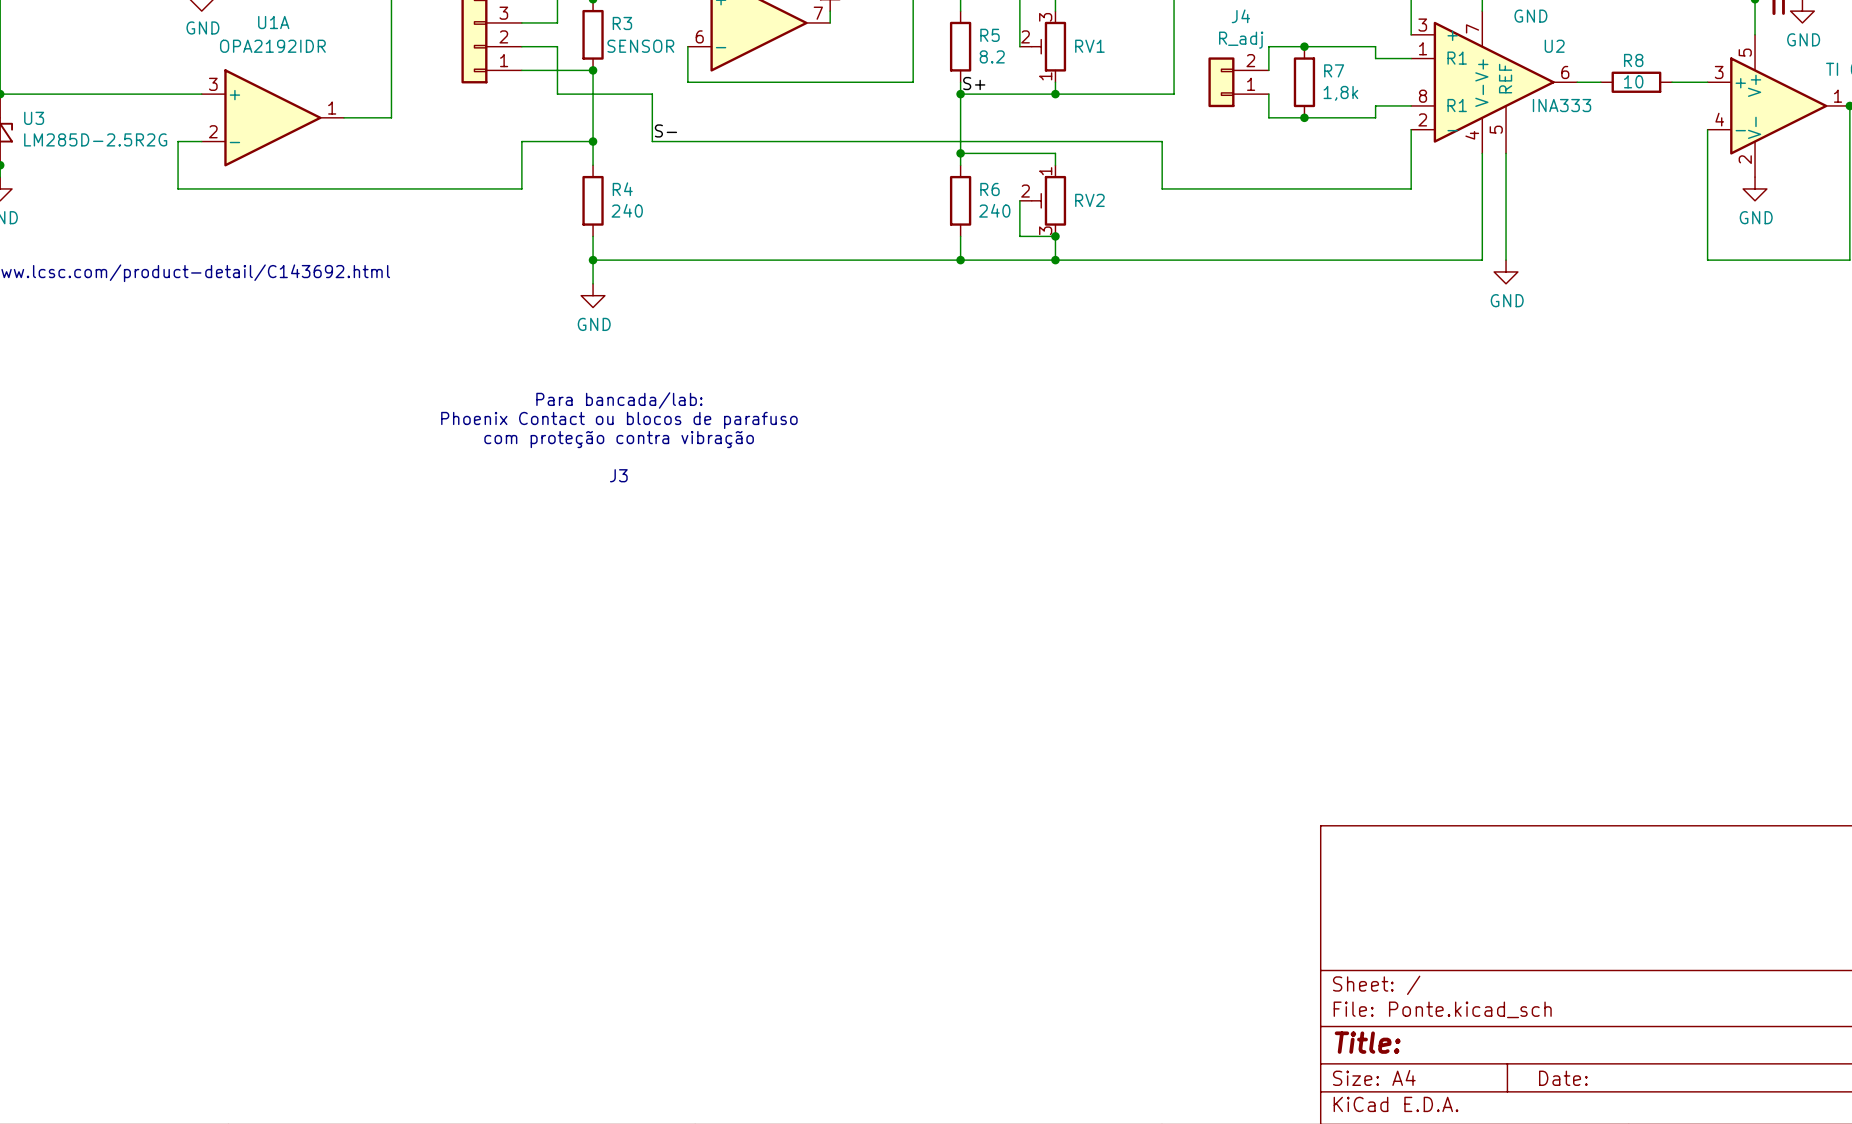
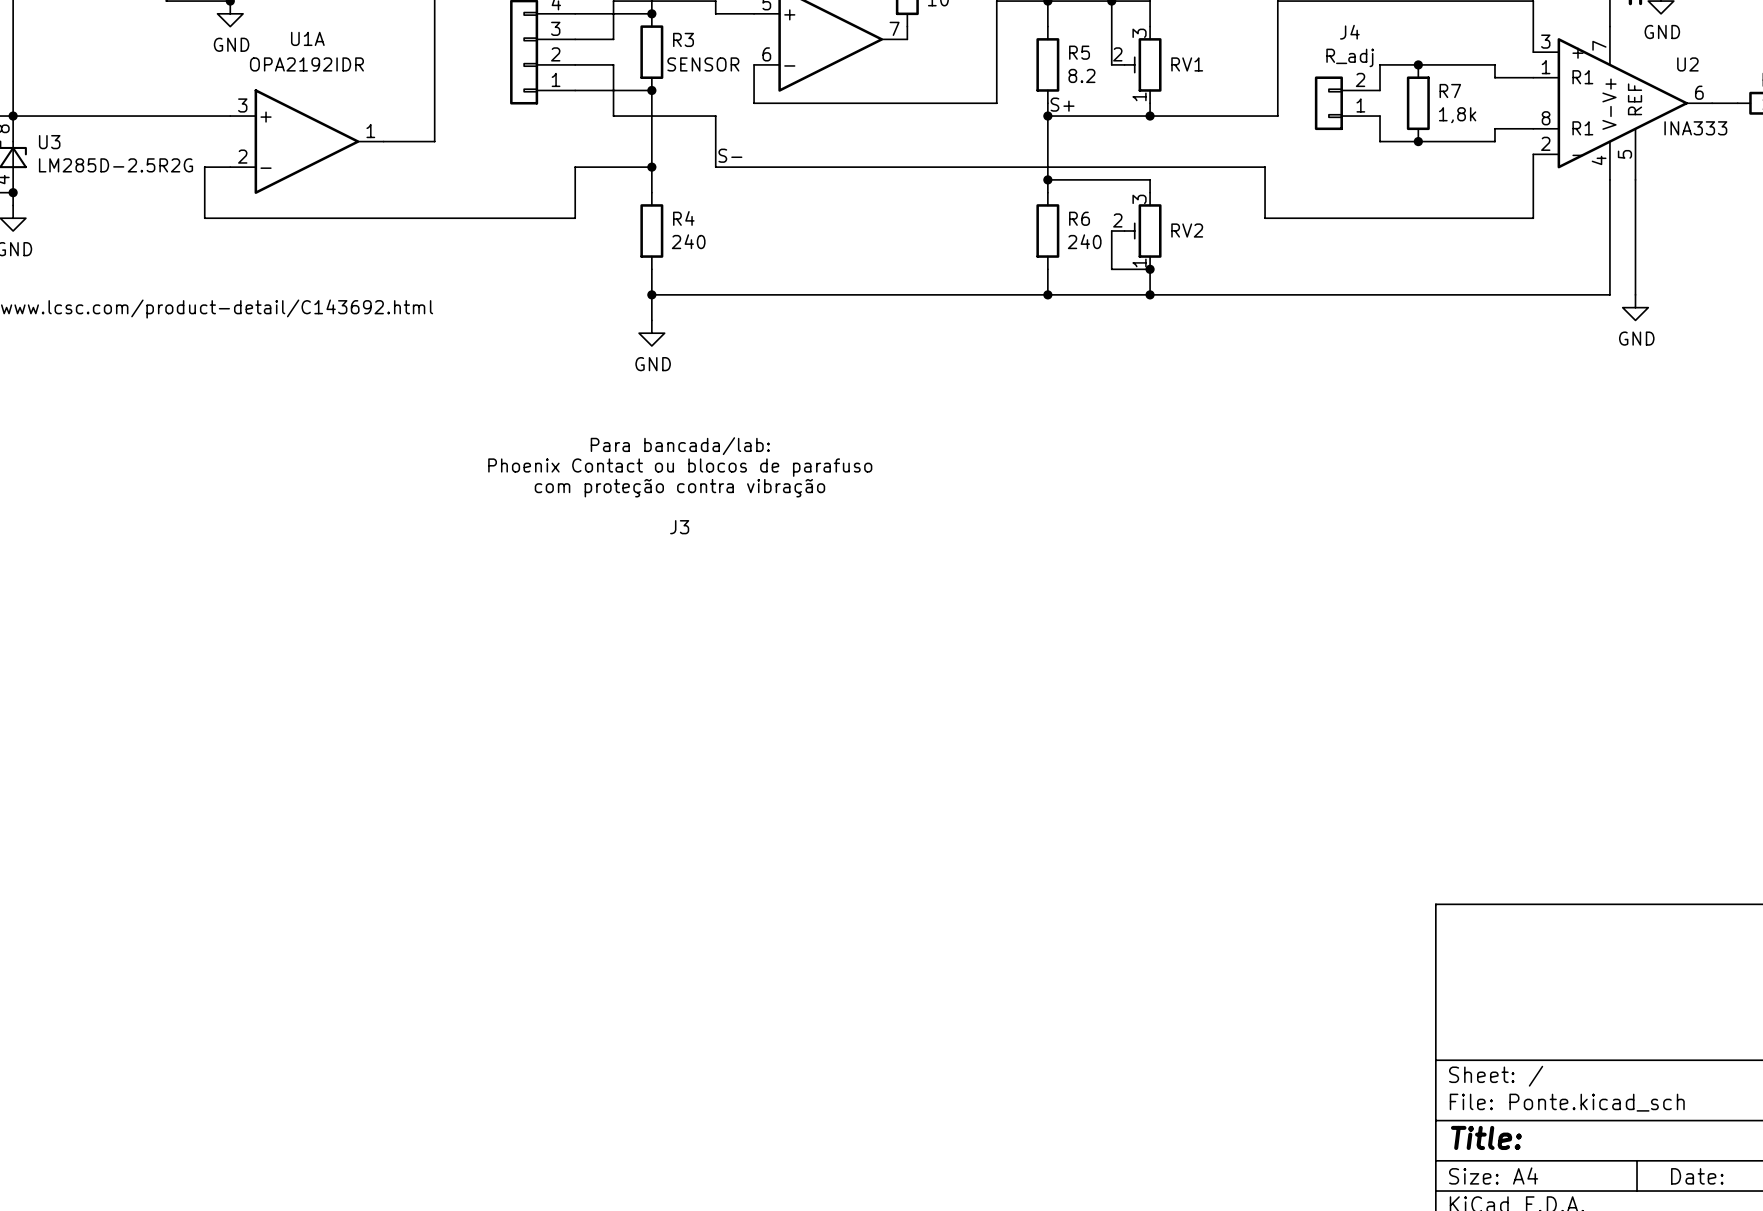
RV2 flip: as is (1048, 200) -> up-down (1143, 231)

